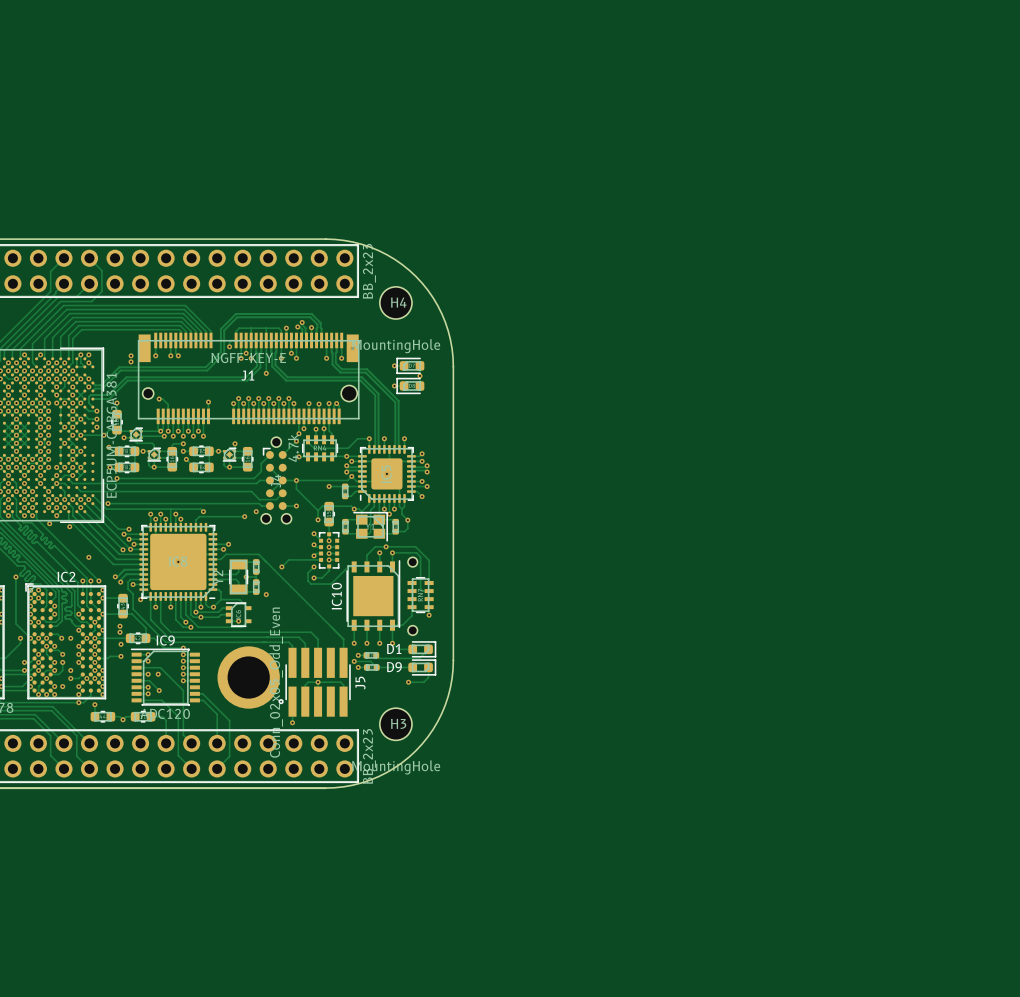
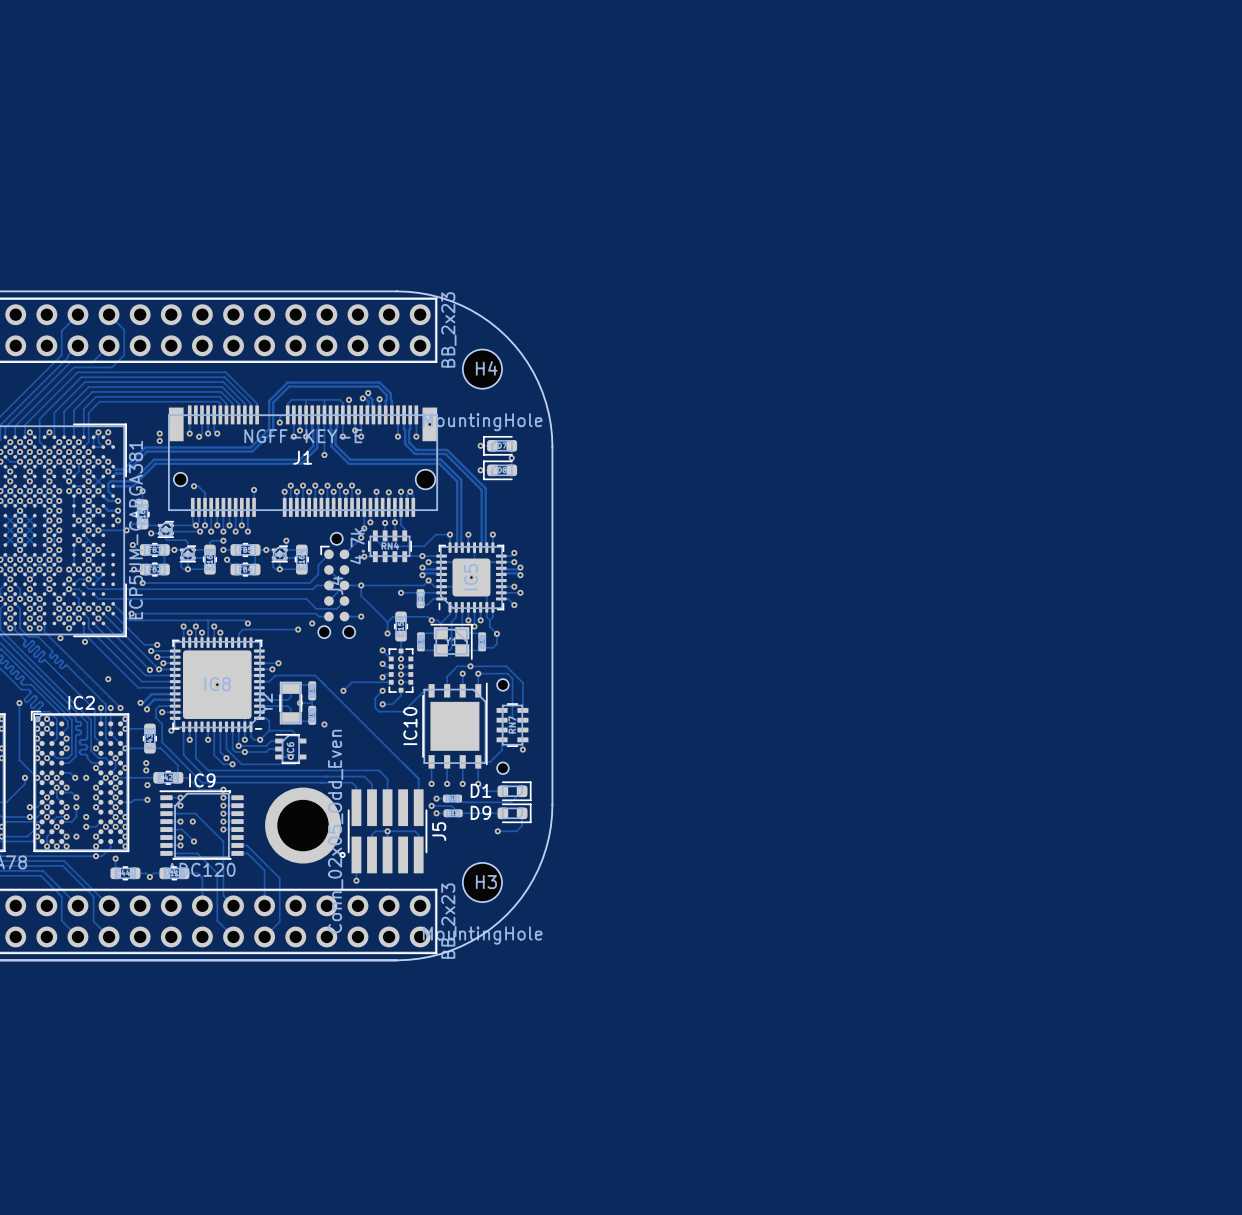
track: none -> (201, 414) (201, 433) (199, 436)
via: none -> (199, 436)

